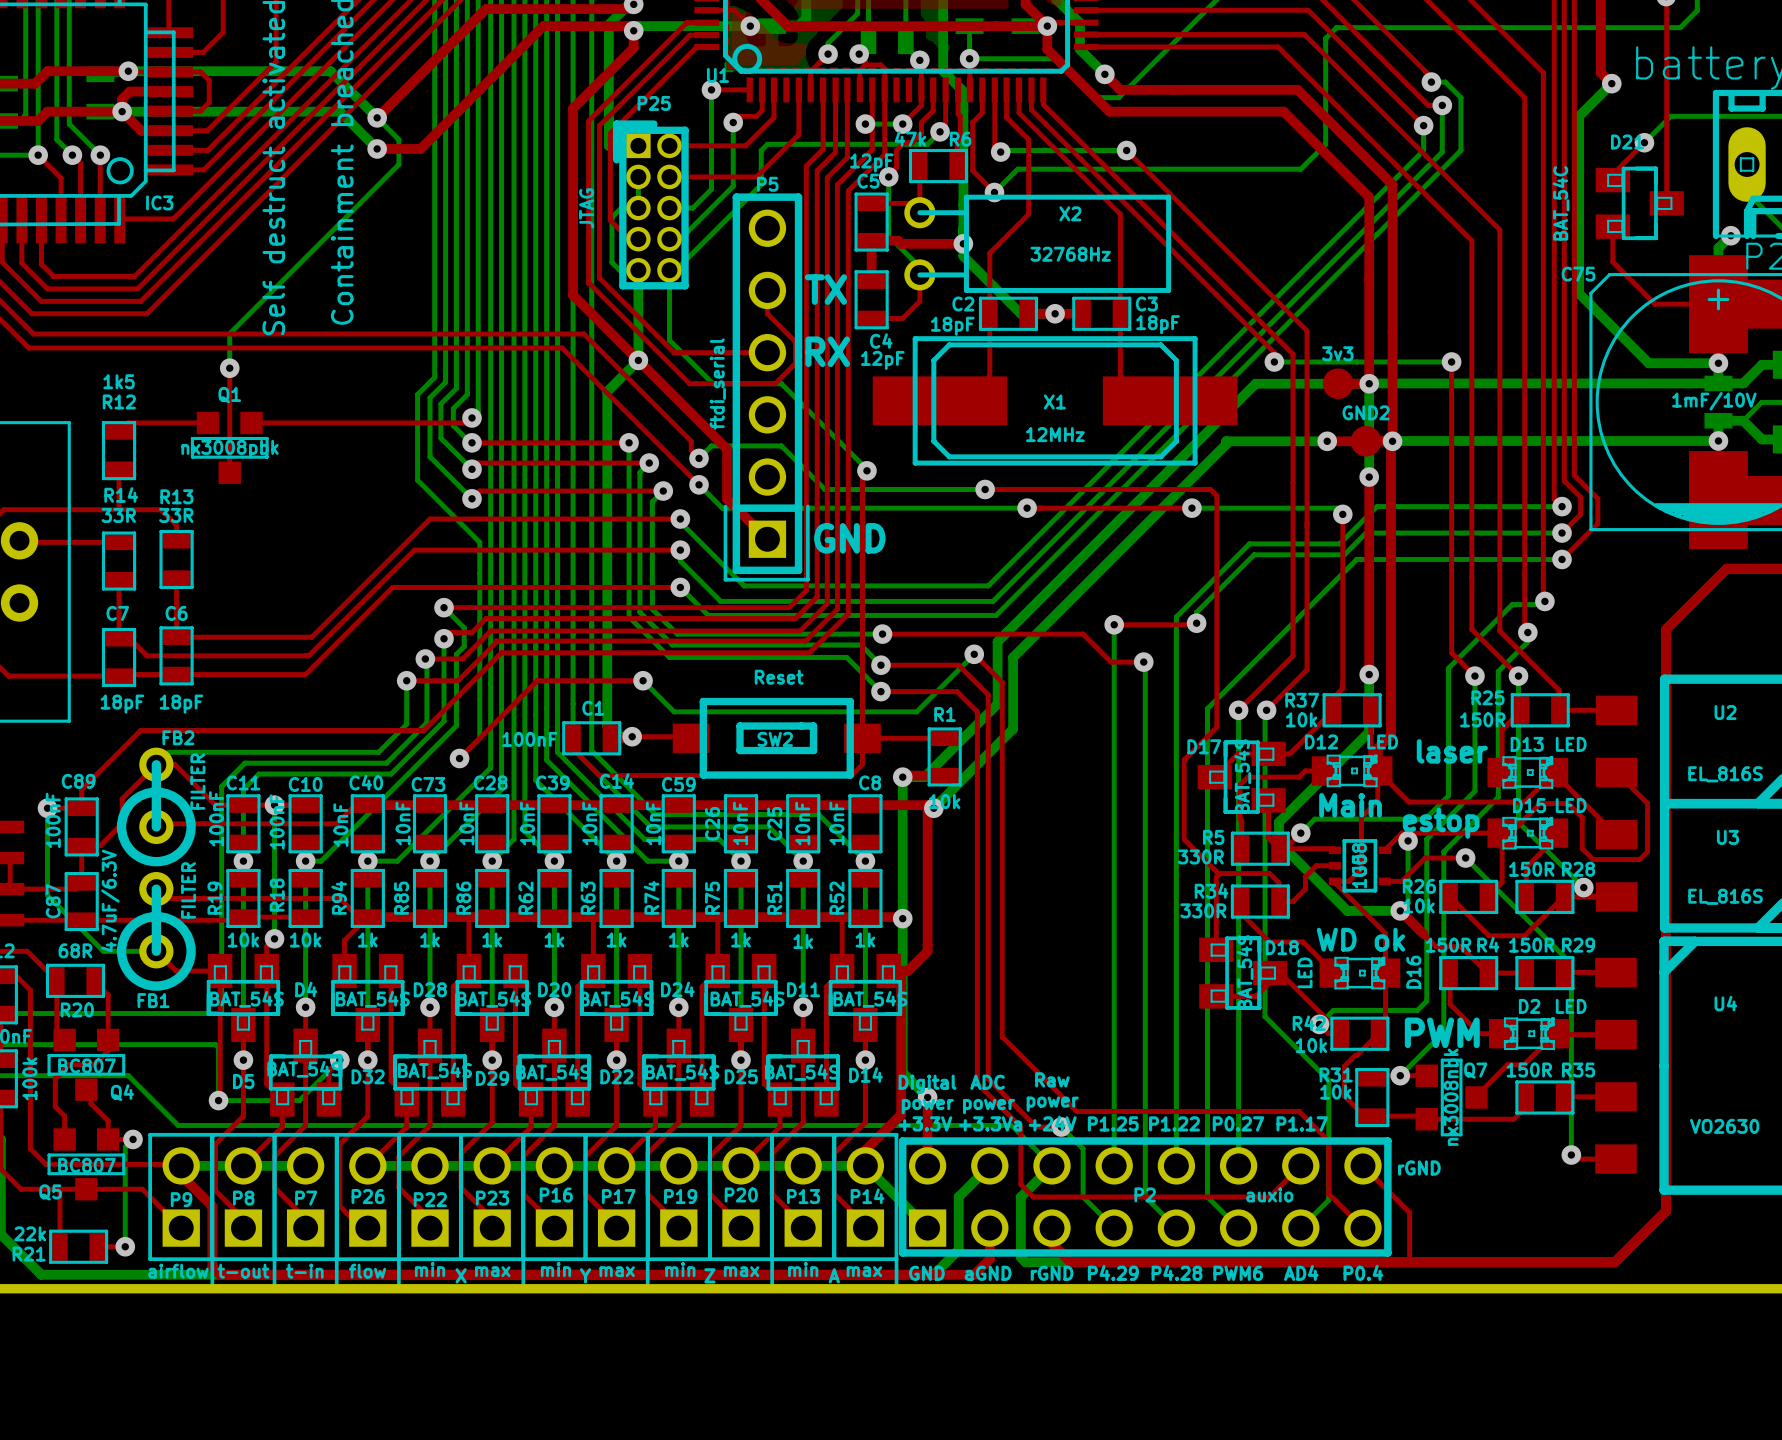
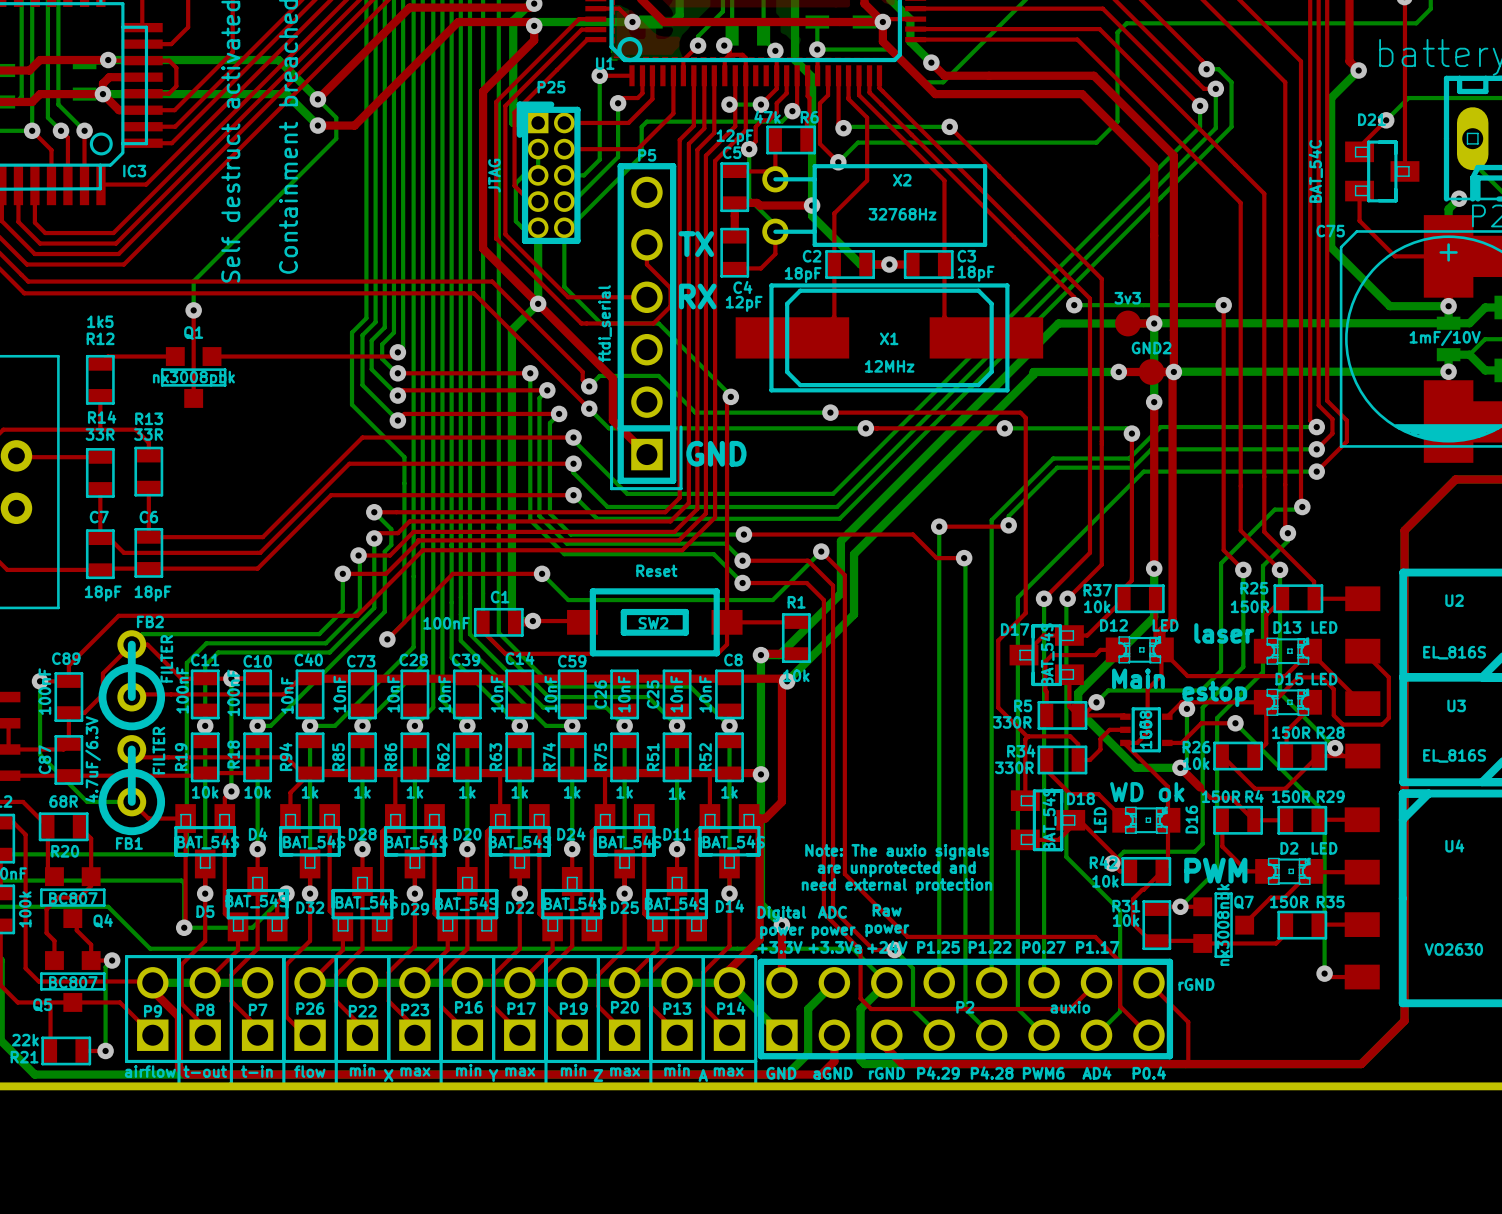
text: none -> Note: The auxio signals (897, 852)
text: none -> are unprotected and (896, 869)
text: none -> need external protection (896, 886)

